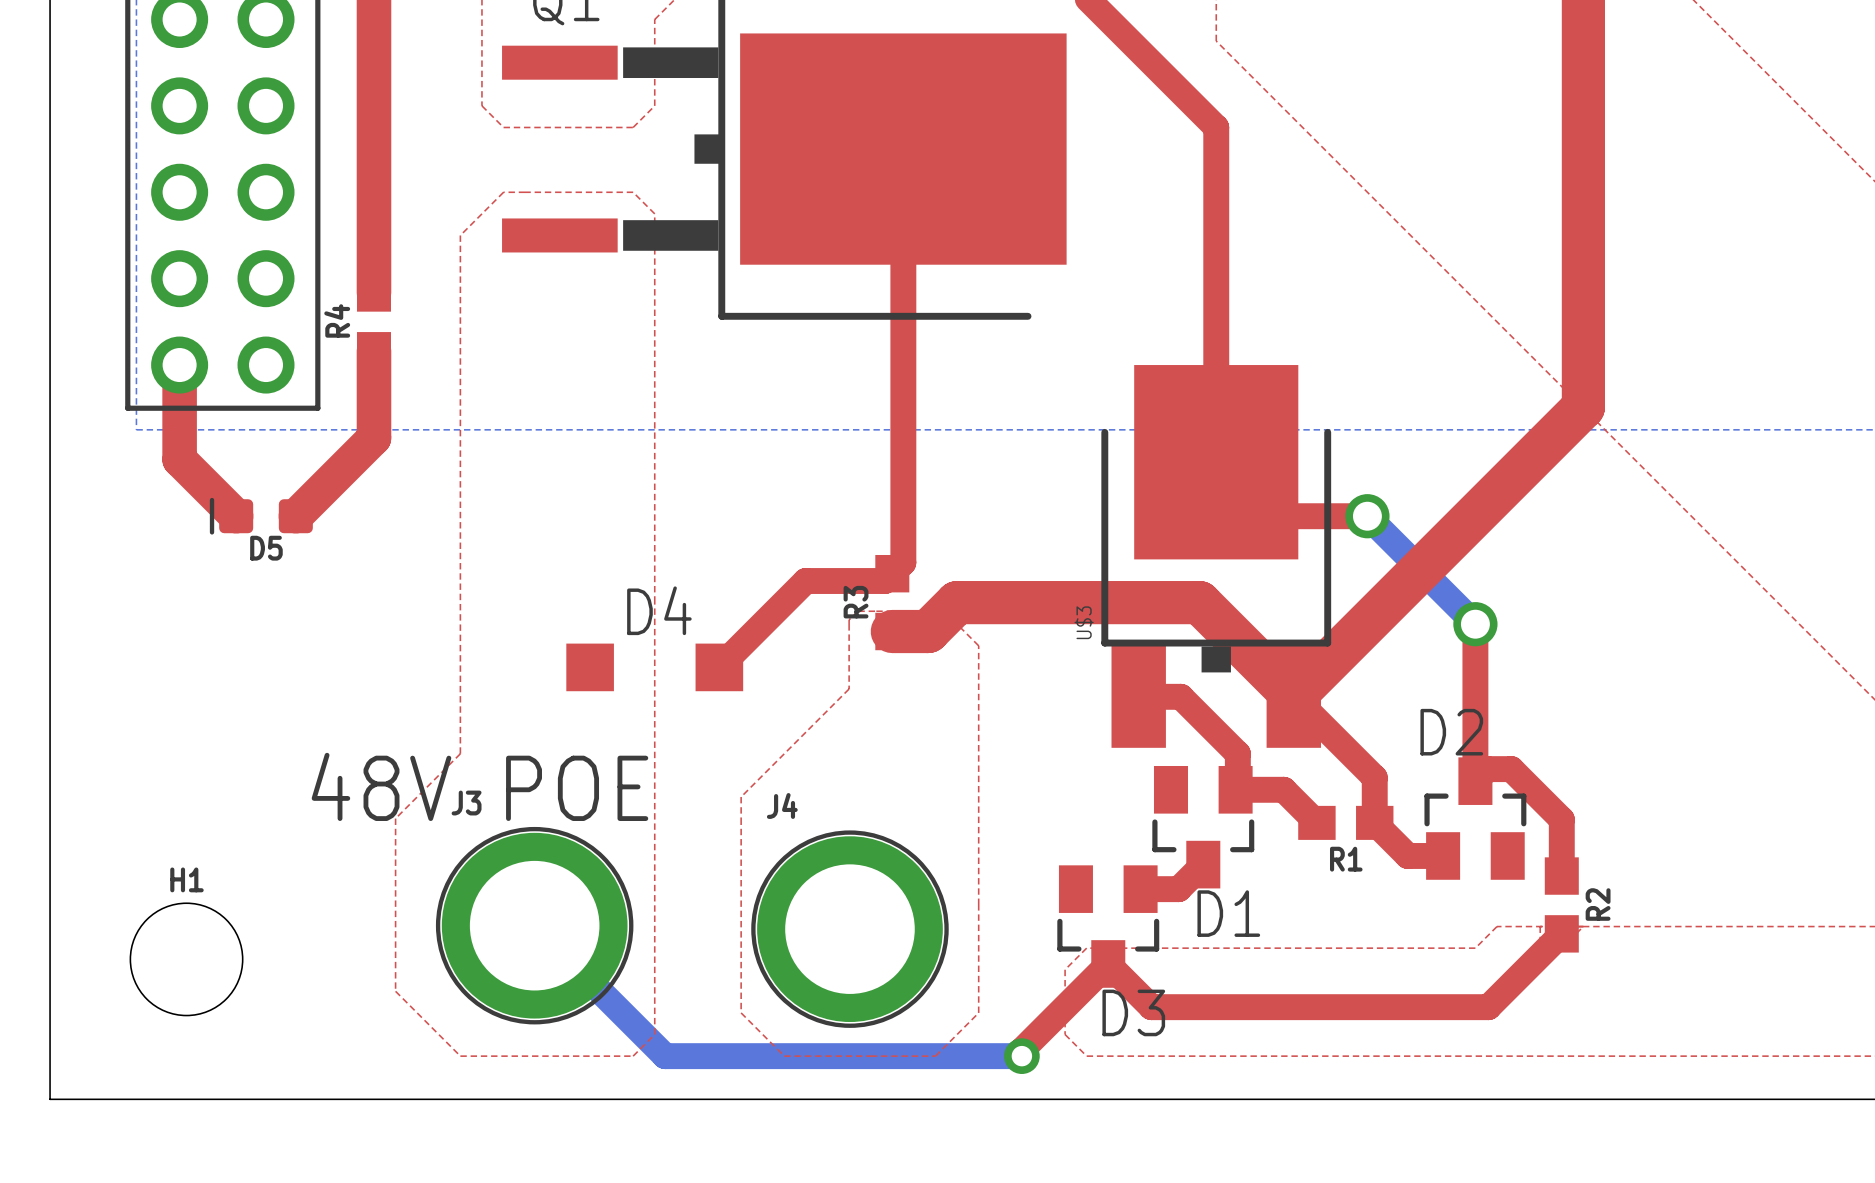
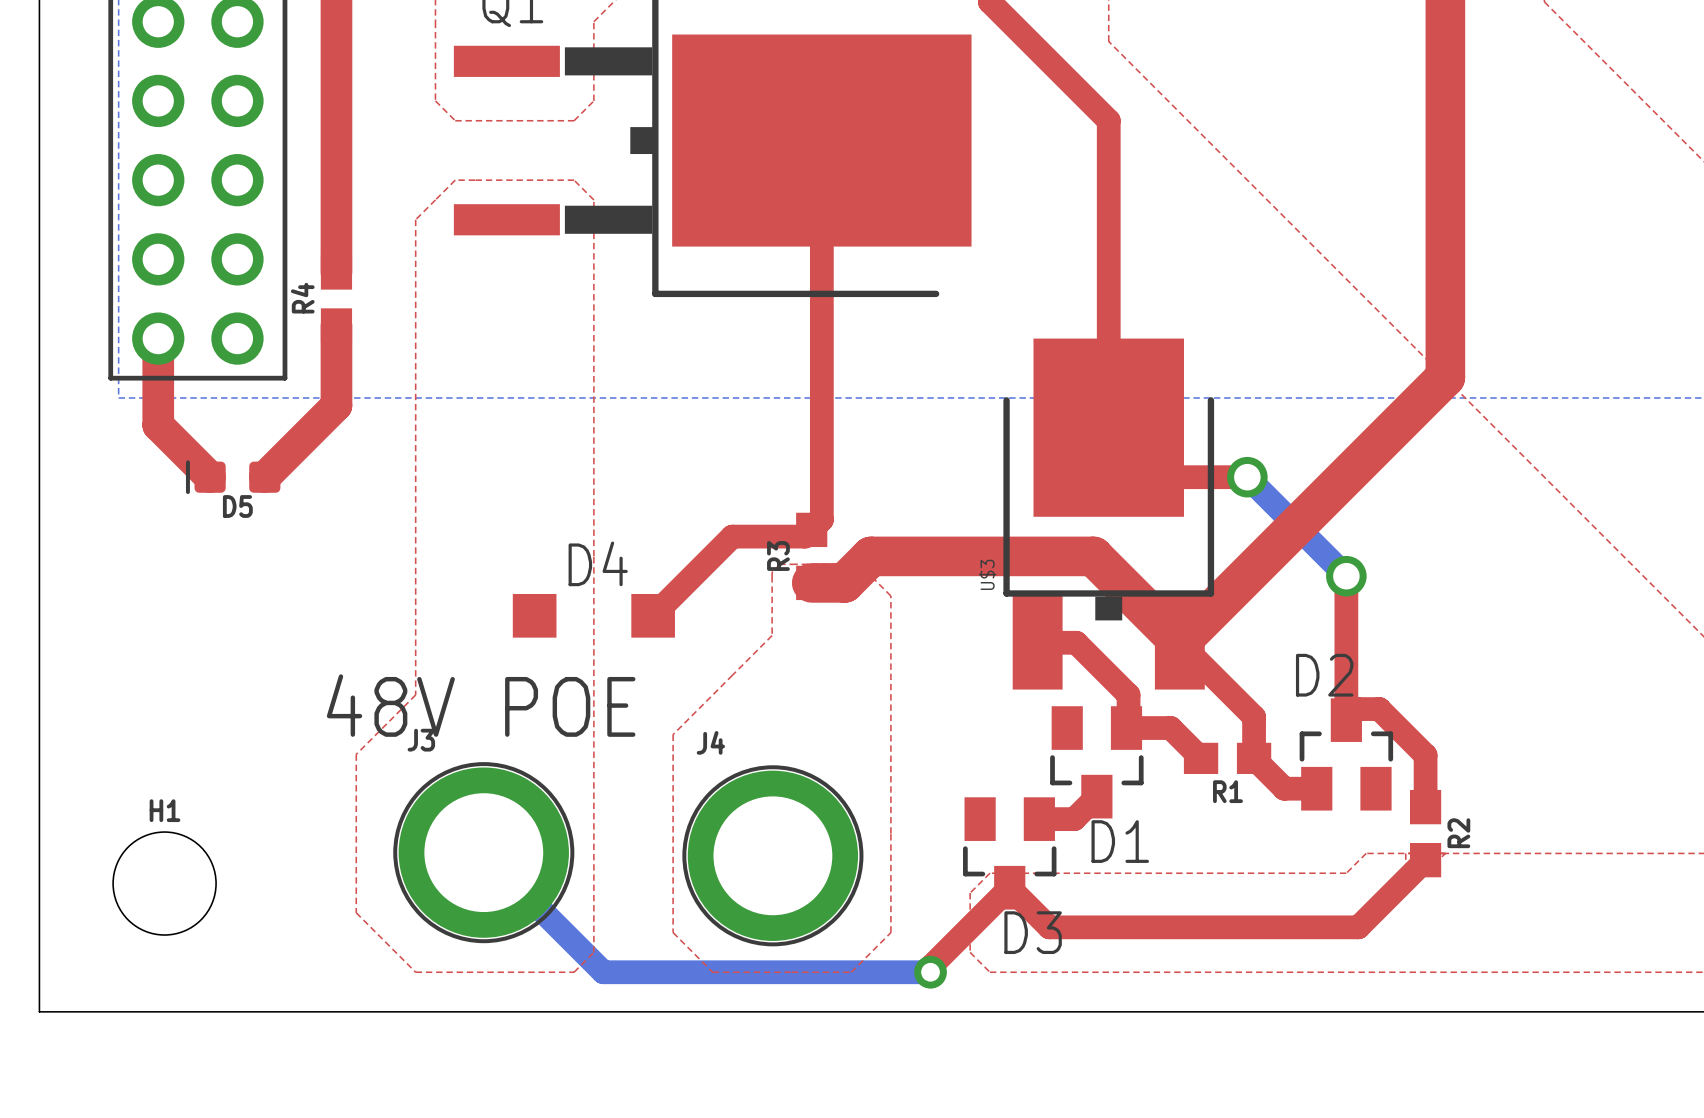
text position: 48V POE (479, 786) -> 48V POE (481, 705)

